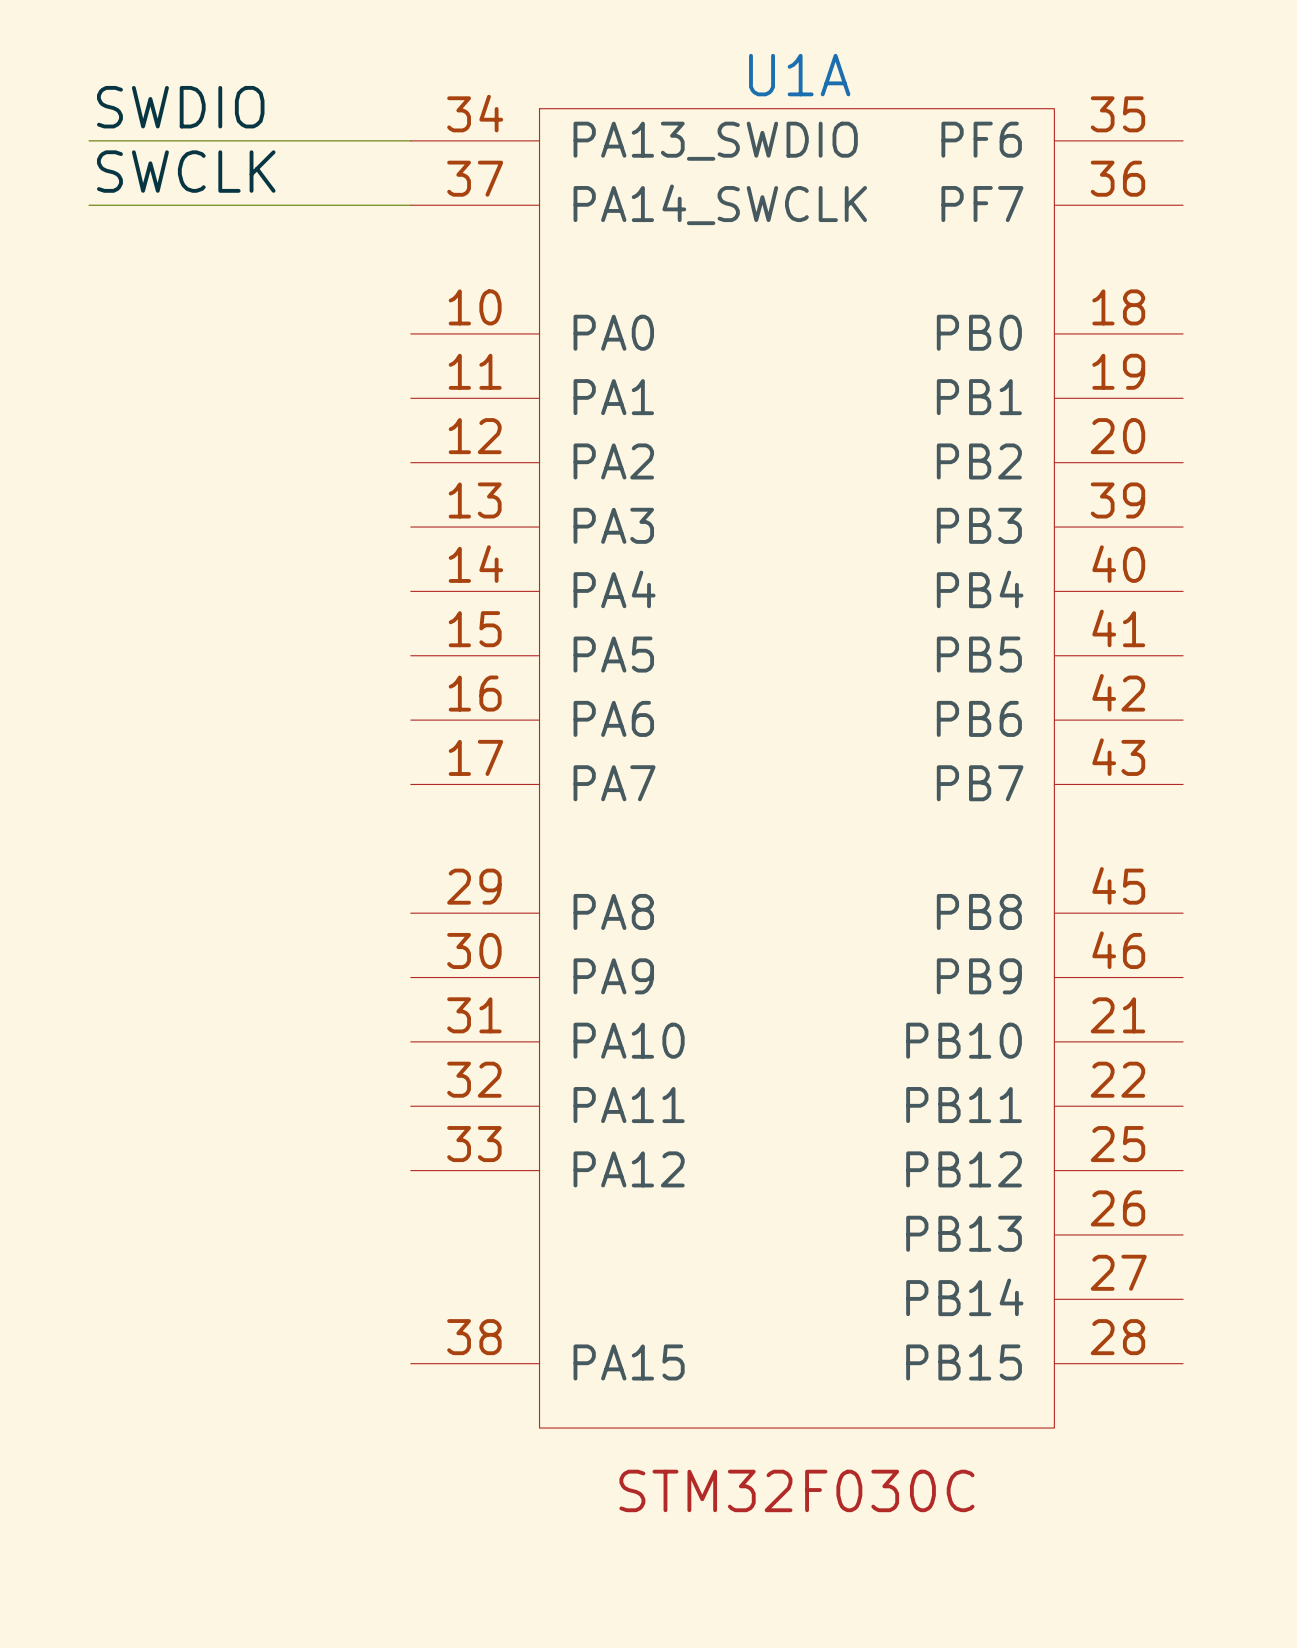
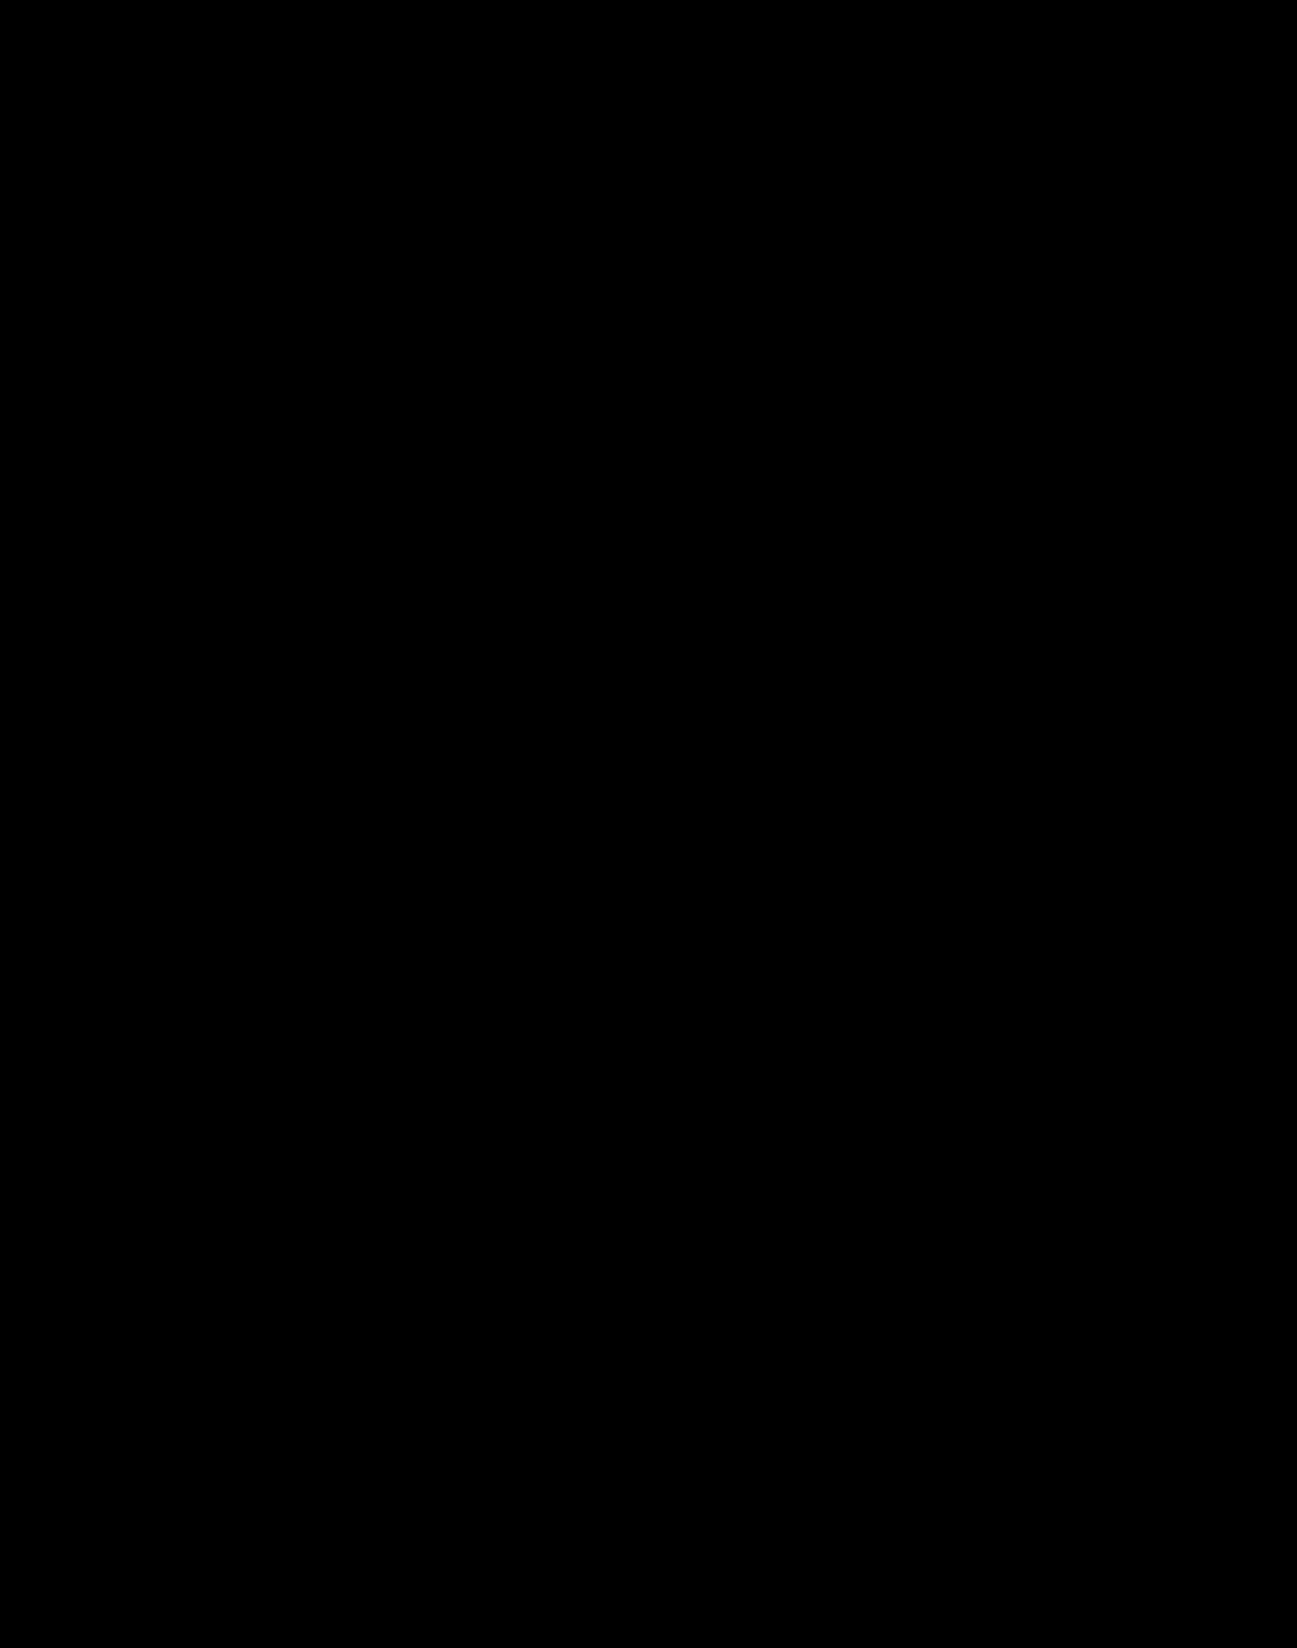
label: SWDIO (180, 107) -> none
wire: (89, 140) (410, 140) -> none
label: SWCLK (186, 171) -> none
wire: (89, 205) (410, 205) -> none
U1A: (796, 768) -> none

